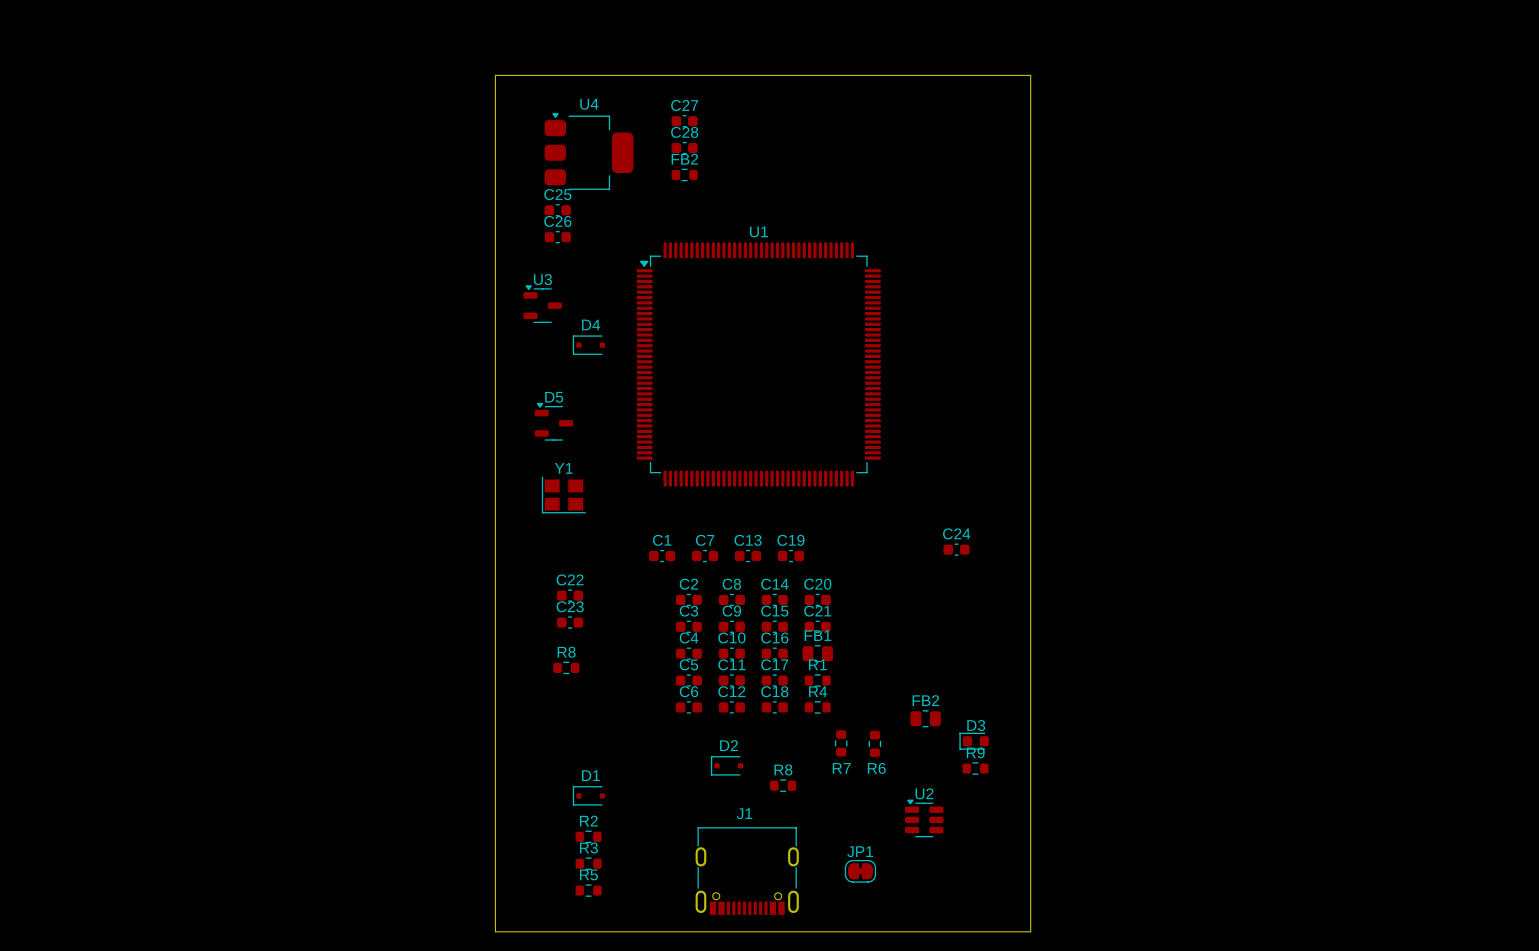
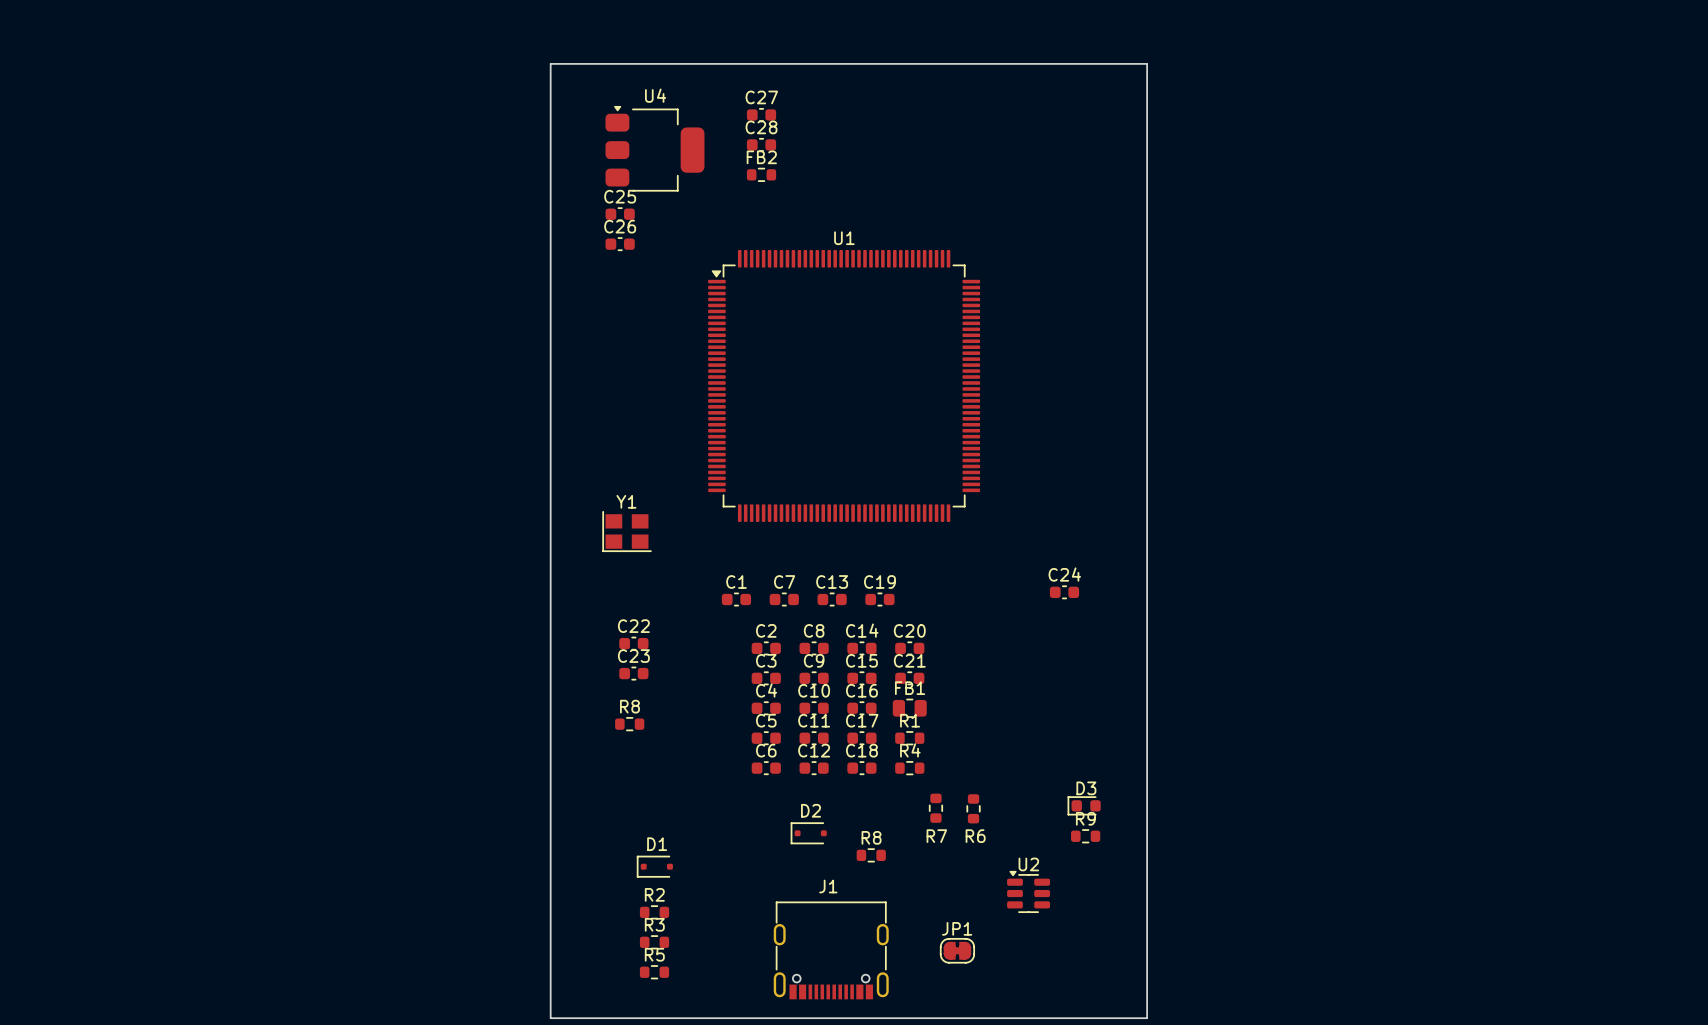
U3: (542, 304) -> none
D4: (588, 345) -> none
D5: (553, 421) -> none
FB2: (925, 718) -> none

